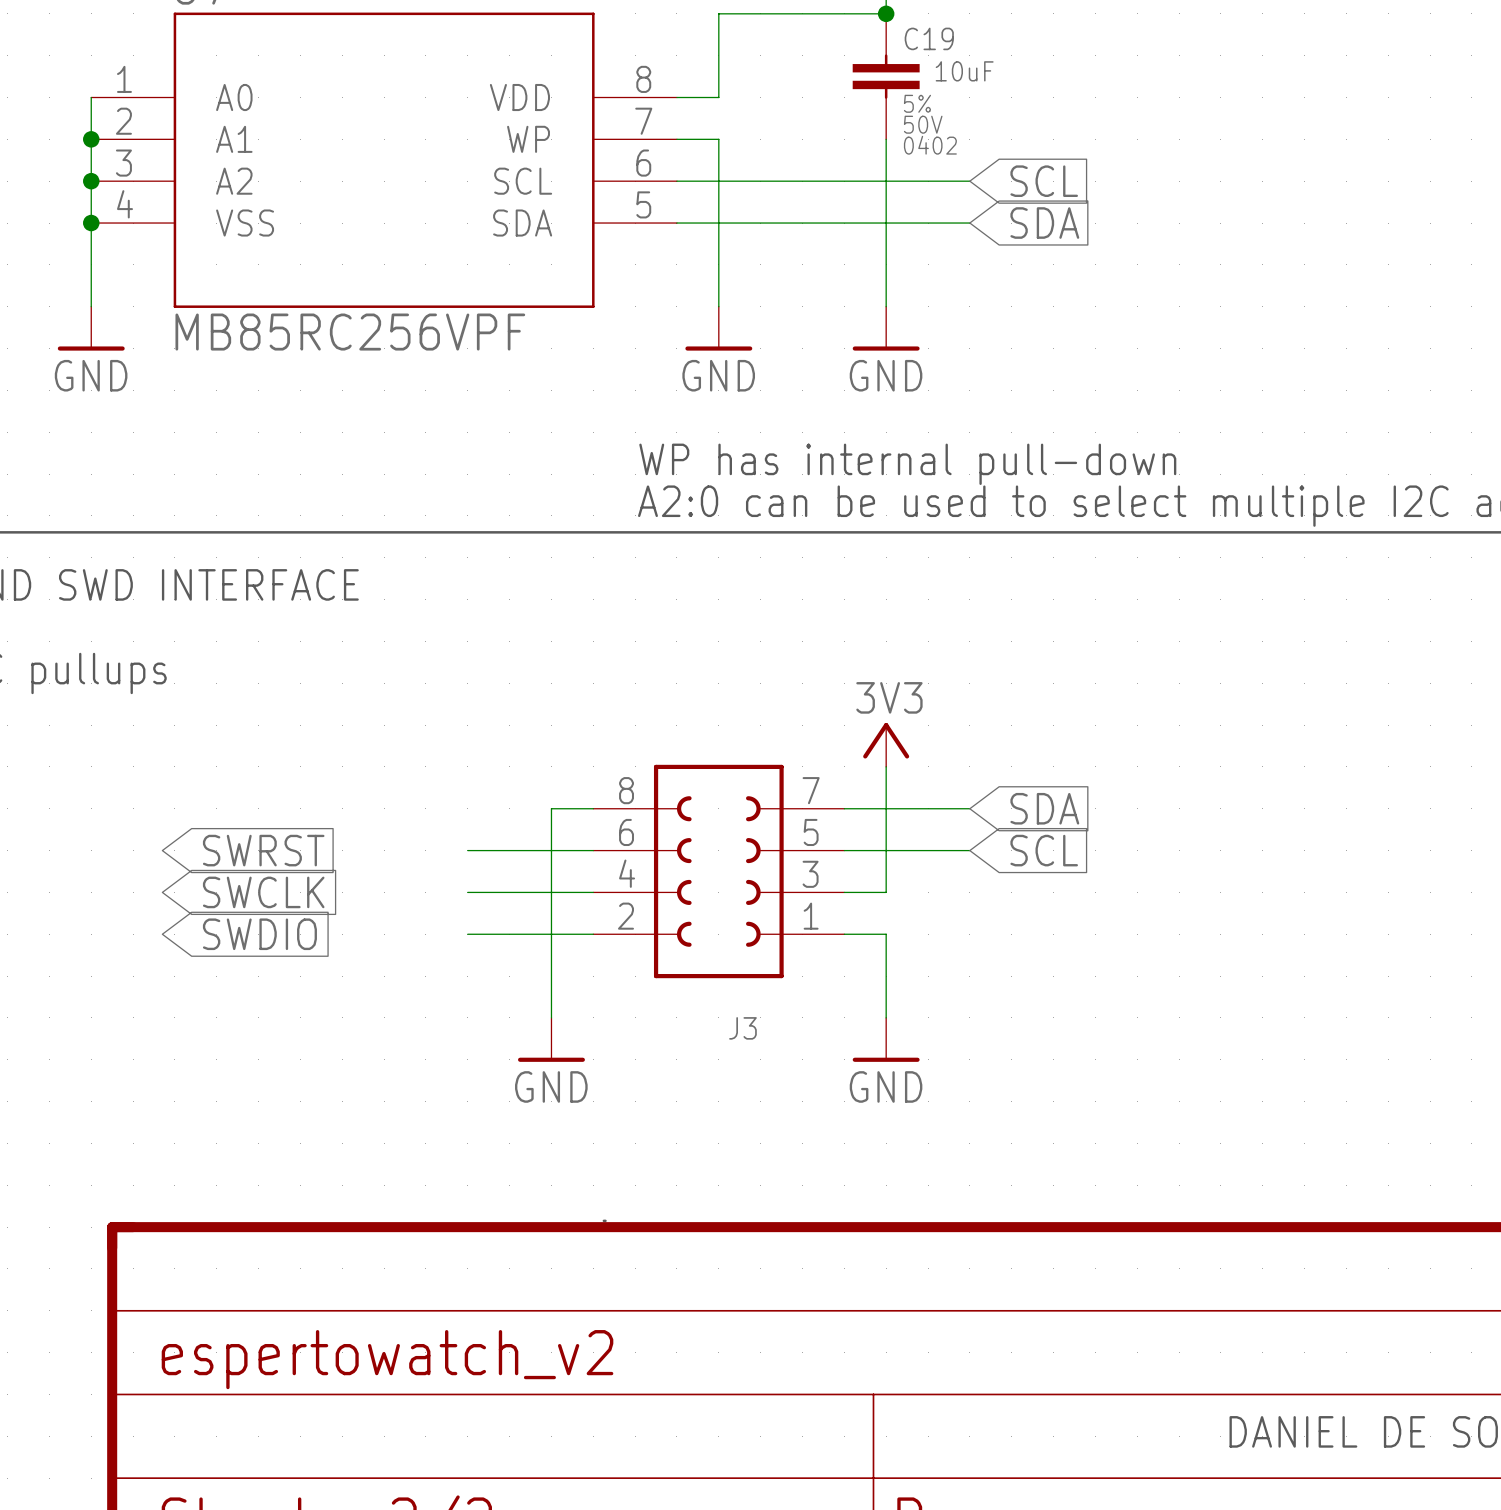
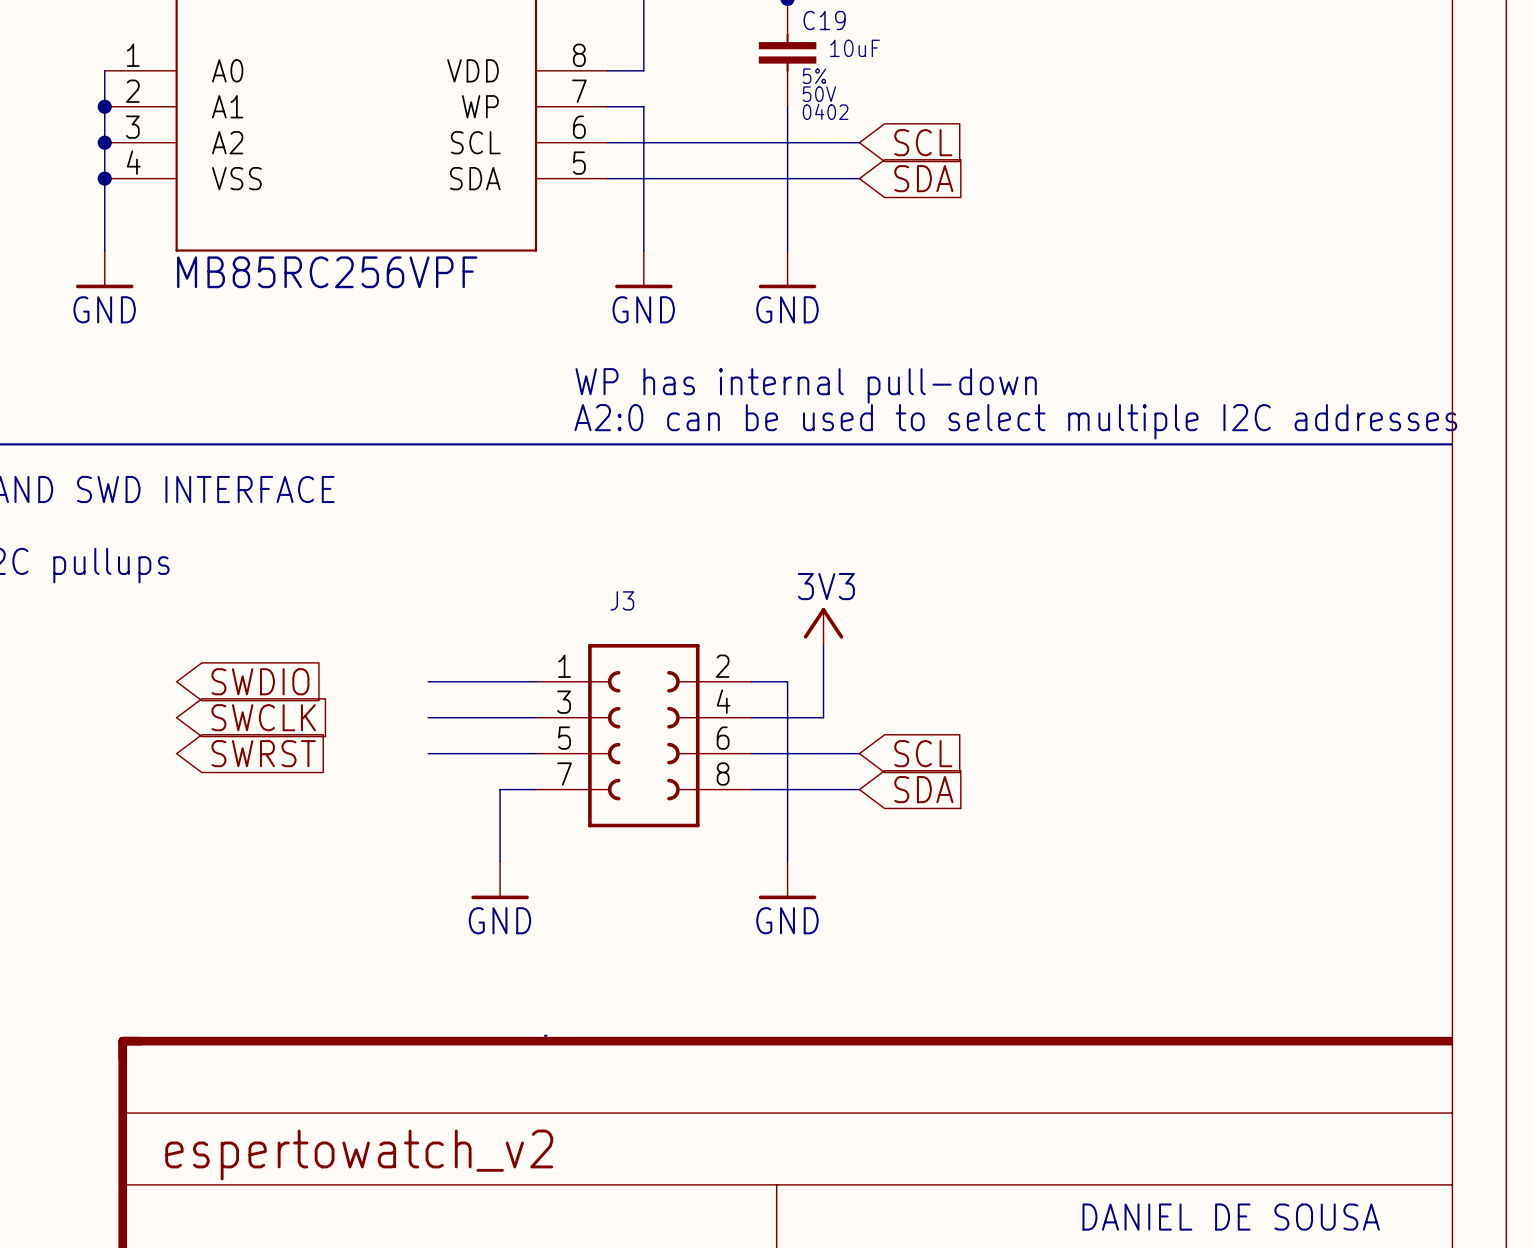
power symbol position: 3V3 (886, 744) -> 3V3 (823, 626)
wire: (886, 766) (886, 808) (969, 808) -> none
wire: (551, 808) (551, 934) (467, 934) -> (500, 681) (428, 681)
global label position: SDA (1044, 808) -> SDA (923, 789)
global label: SWRST (263, 850) -> SWCLK (263, 717)
wire: (928, 850) (969, 850) -> (823, 717) (823, 645)
global label position: SCL (1044, 850) -> SCL (923, 753)
J3 rotation: 0° (718, 871) -> 180° (643, 735)
global label: SWCLK (263, 892) -> SWRST (263, 753)
wire: none -> (859, 753) (787, 753) (787, 789) (859, 789)
global label position: SWDIO (259, 934) -> SWDIO (260, 681)

